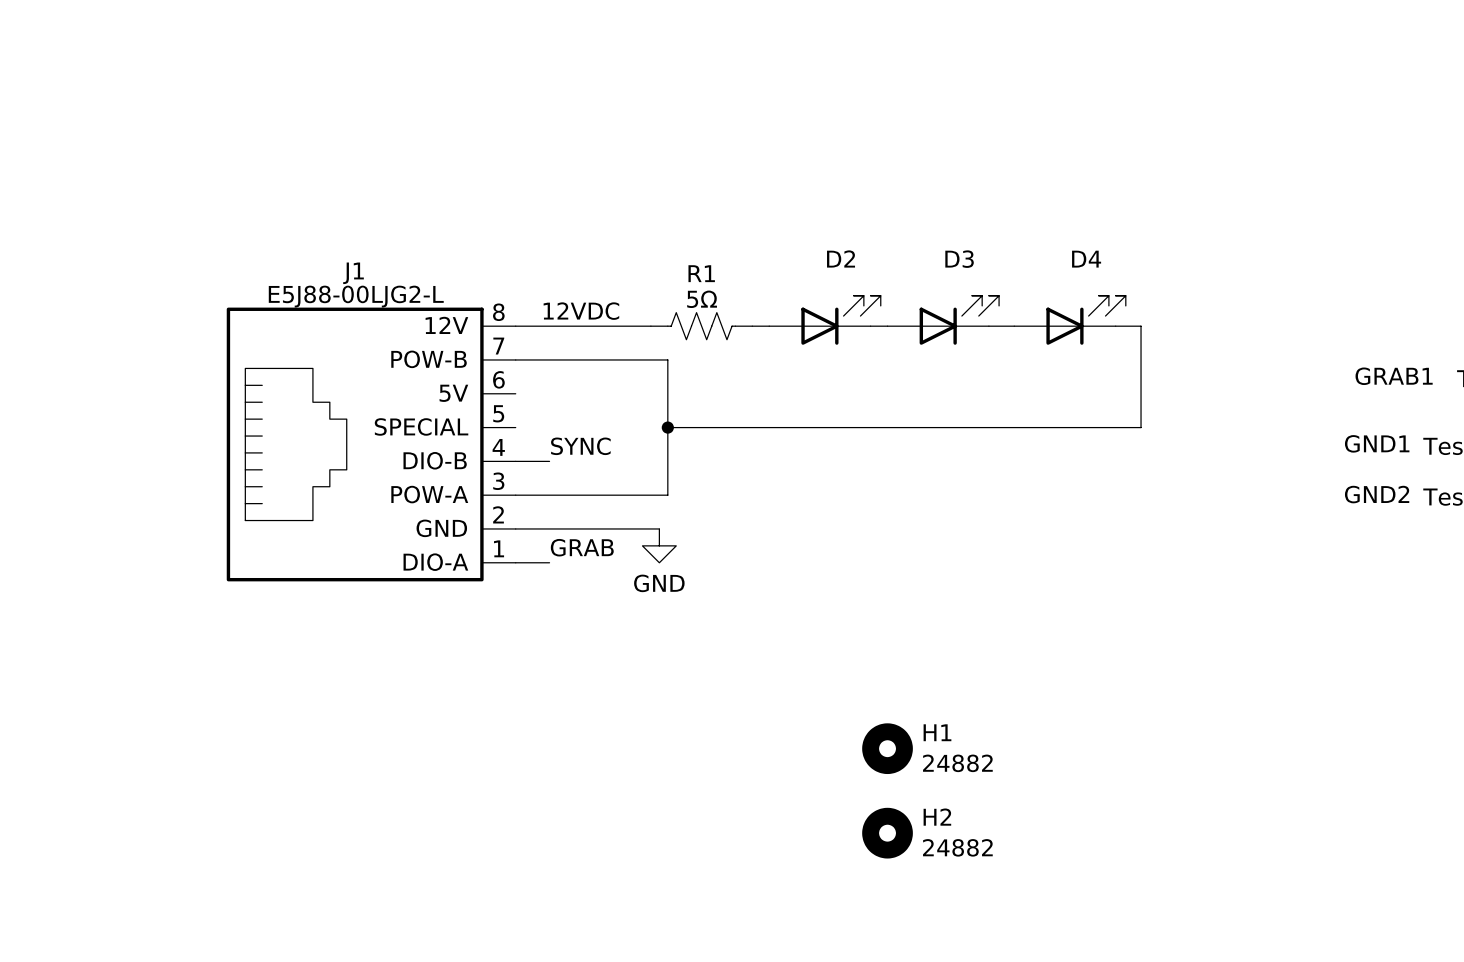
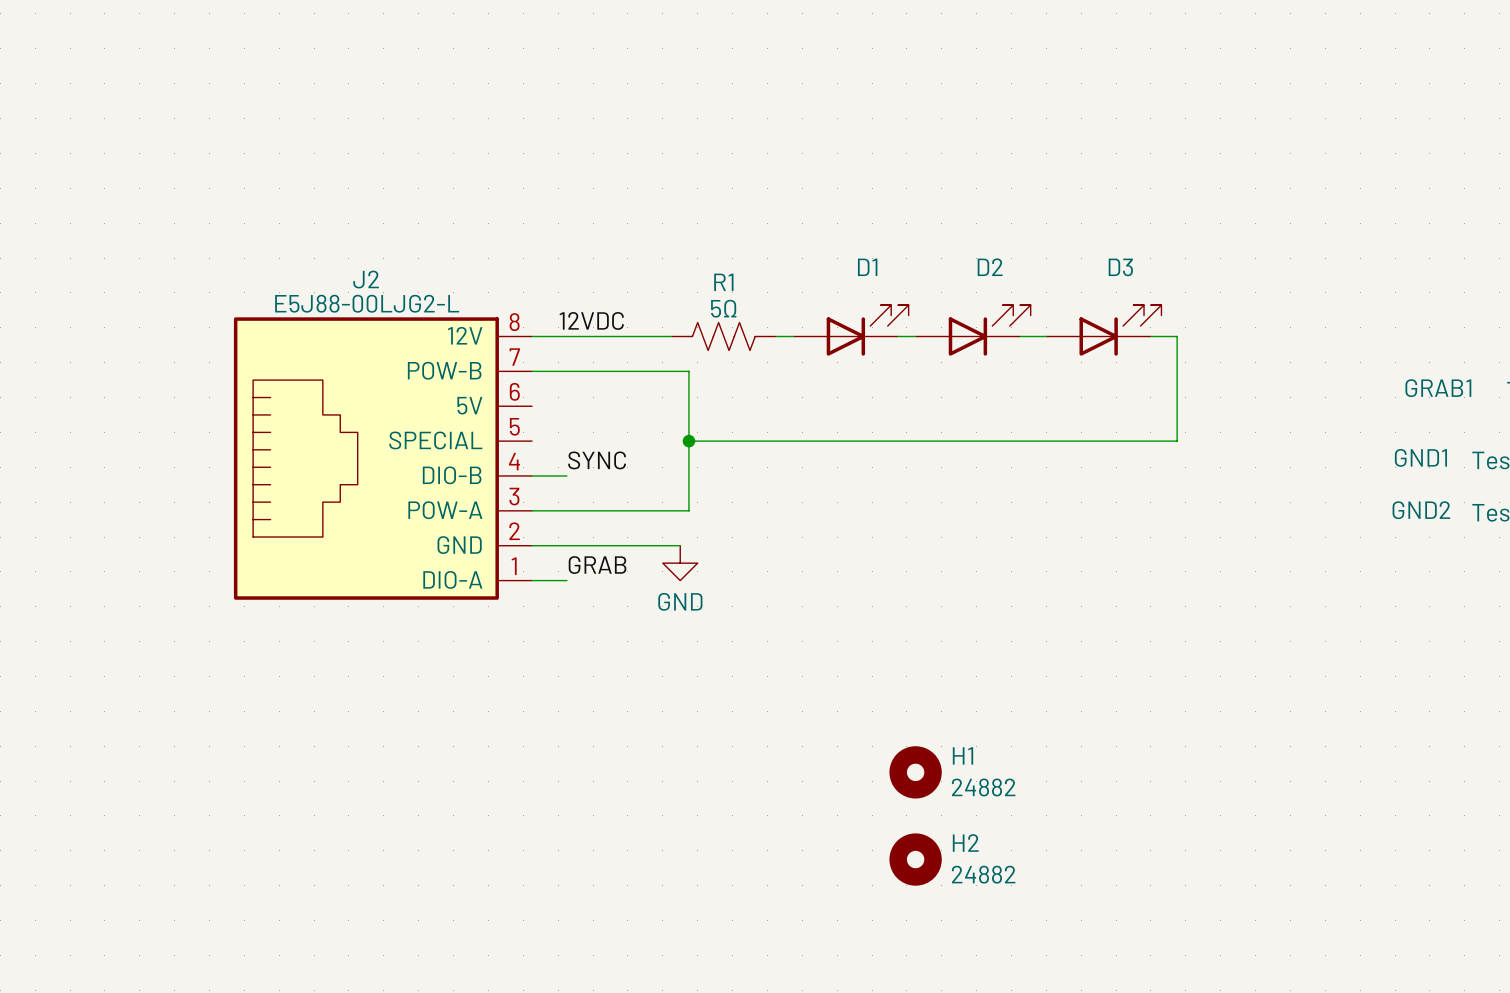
D2 name: D2 (841, 258) -> D1 (867, 267)
D3 name: D3 (959, 259) -> D2 (990, 267)
D4 name: D4 (1086, 259) -> D3 (1120, 267)
J1 name: J1 (353, 273) -> J2 (366, 279)

